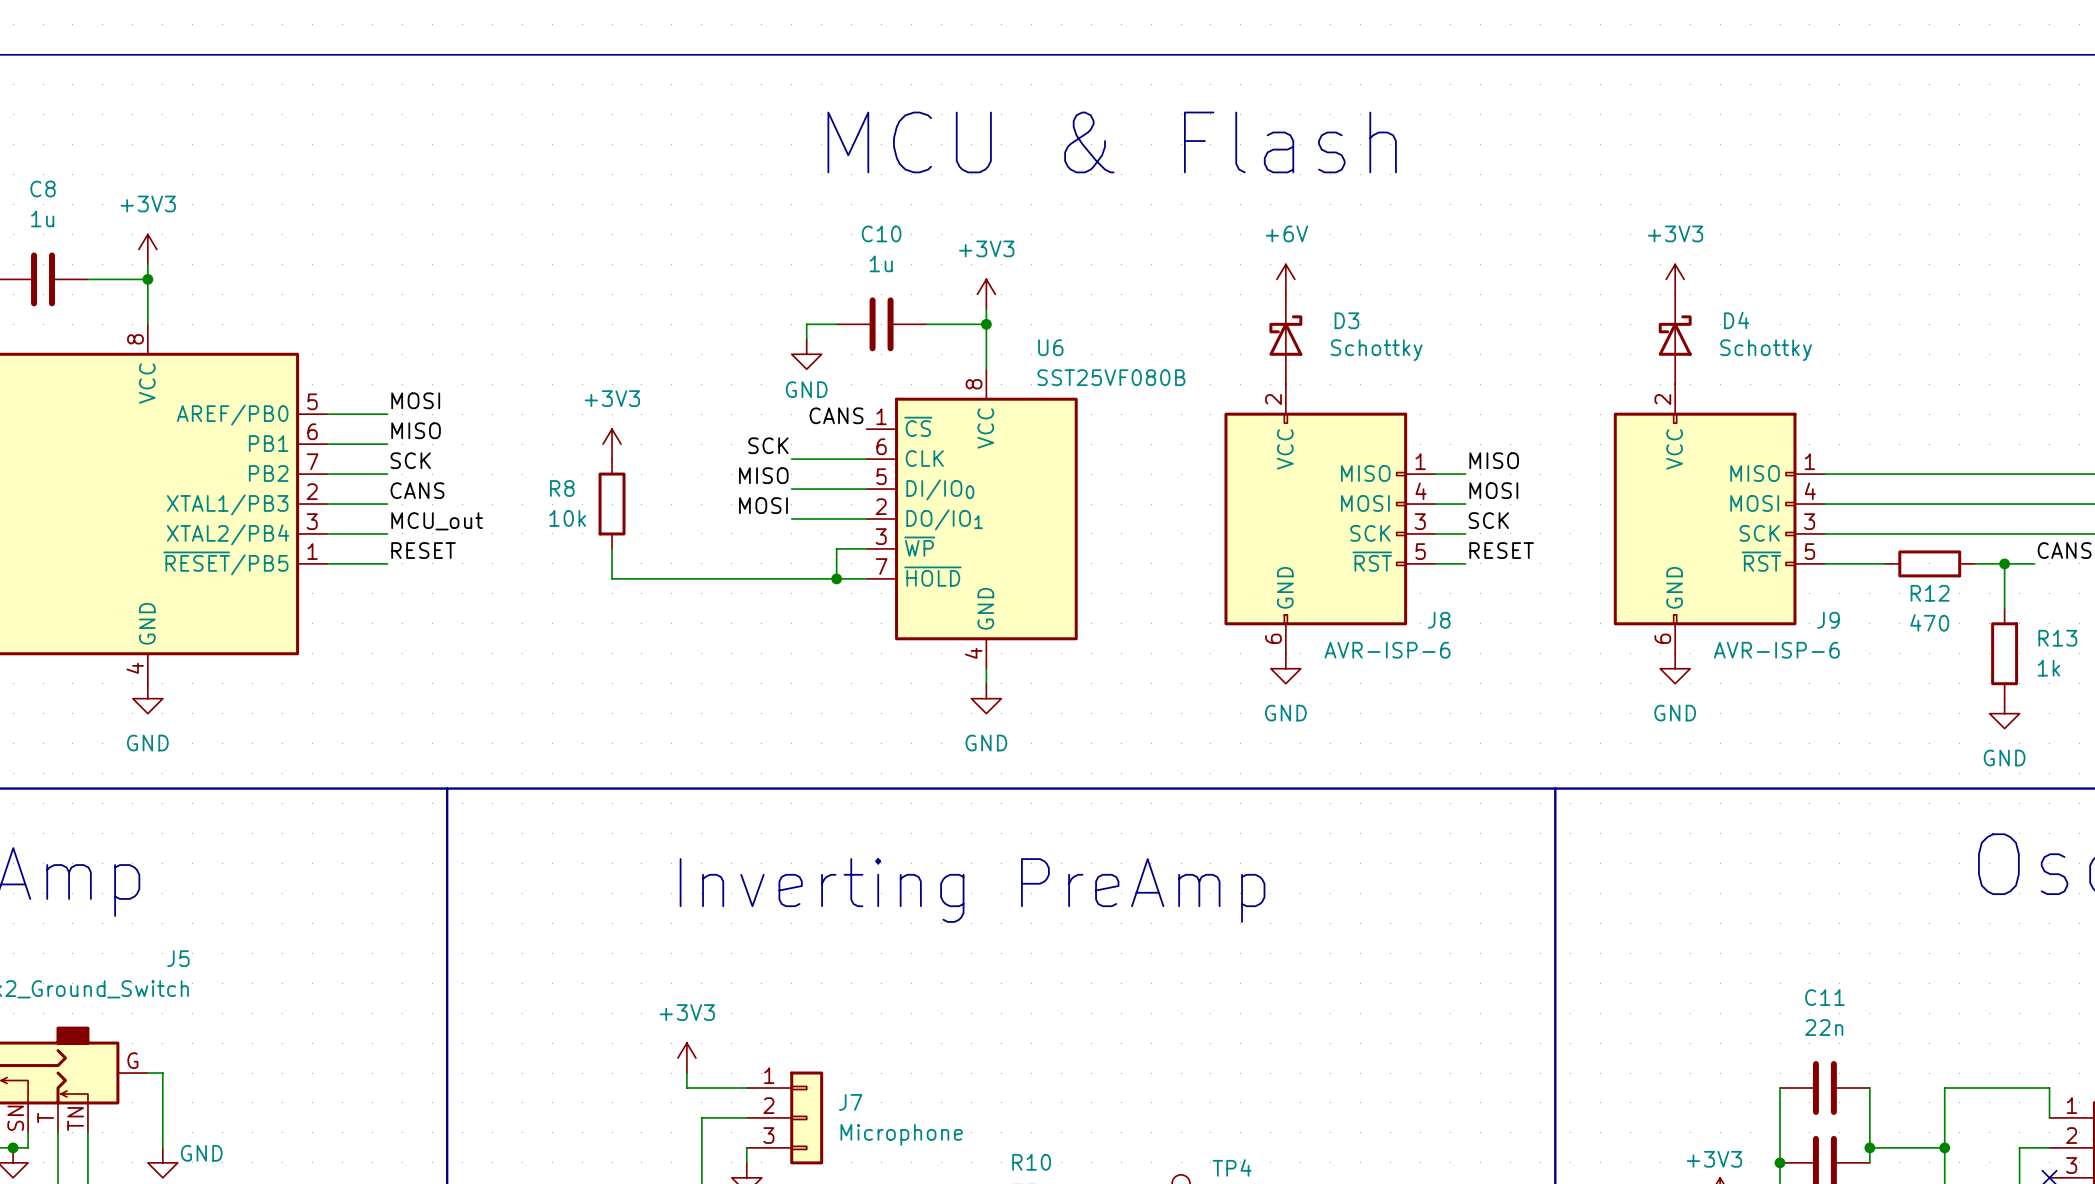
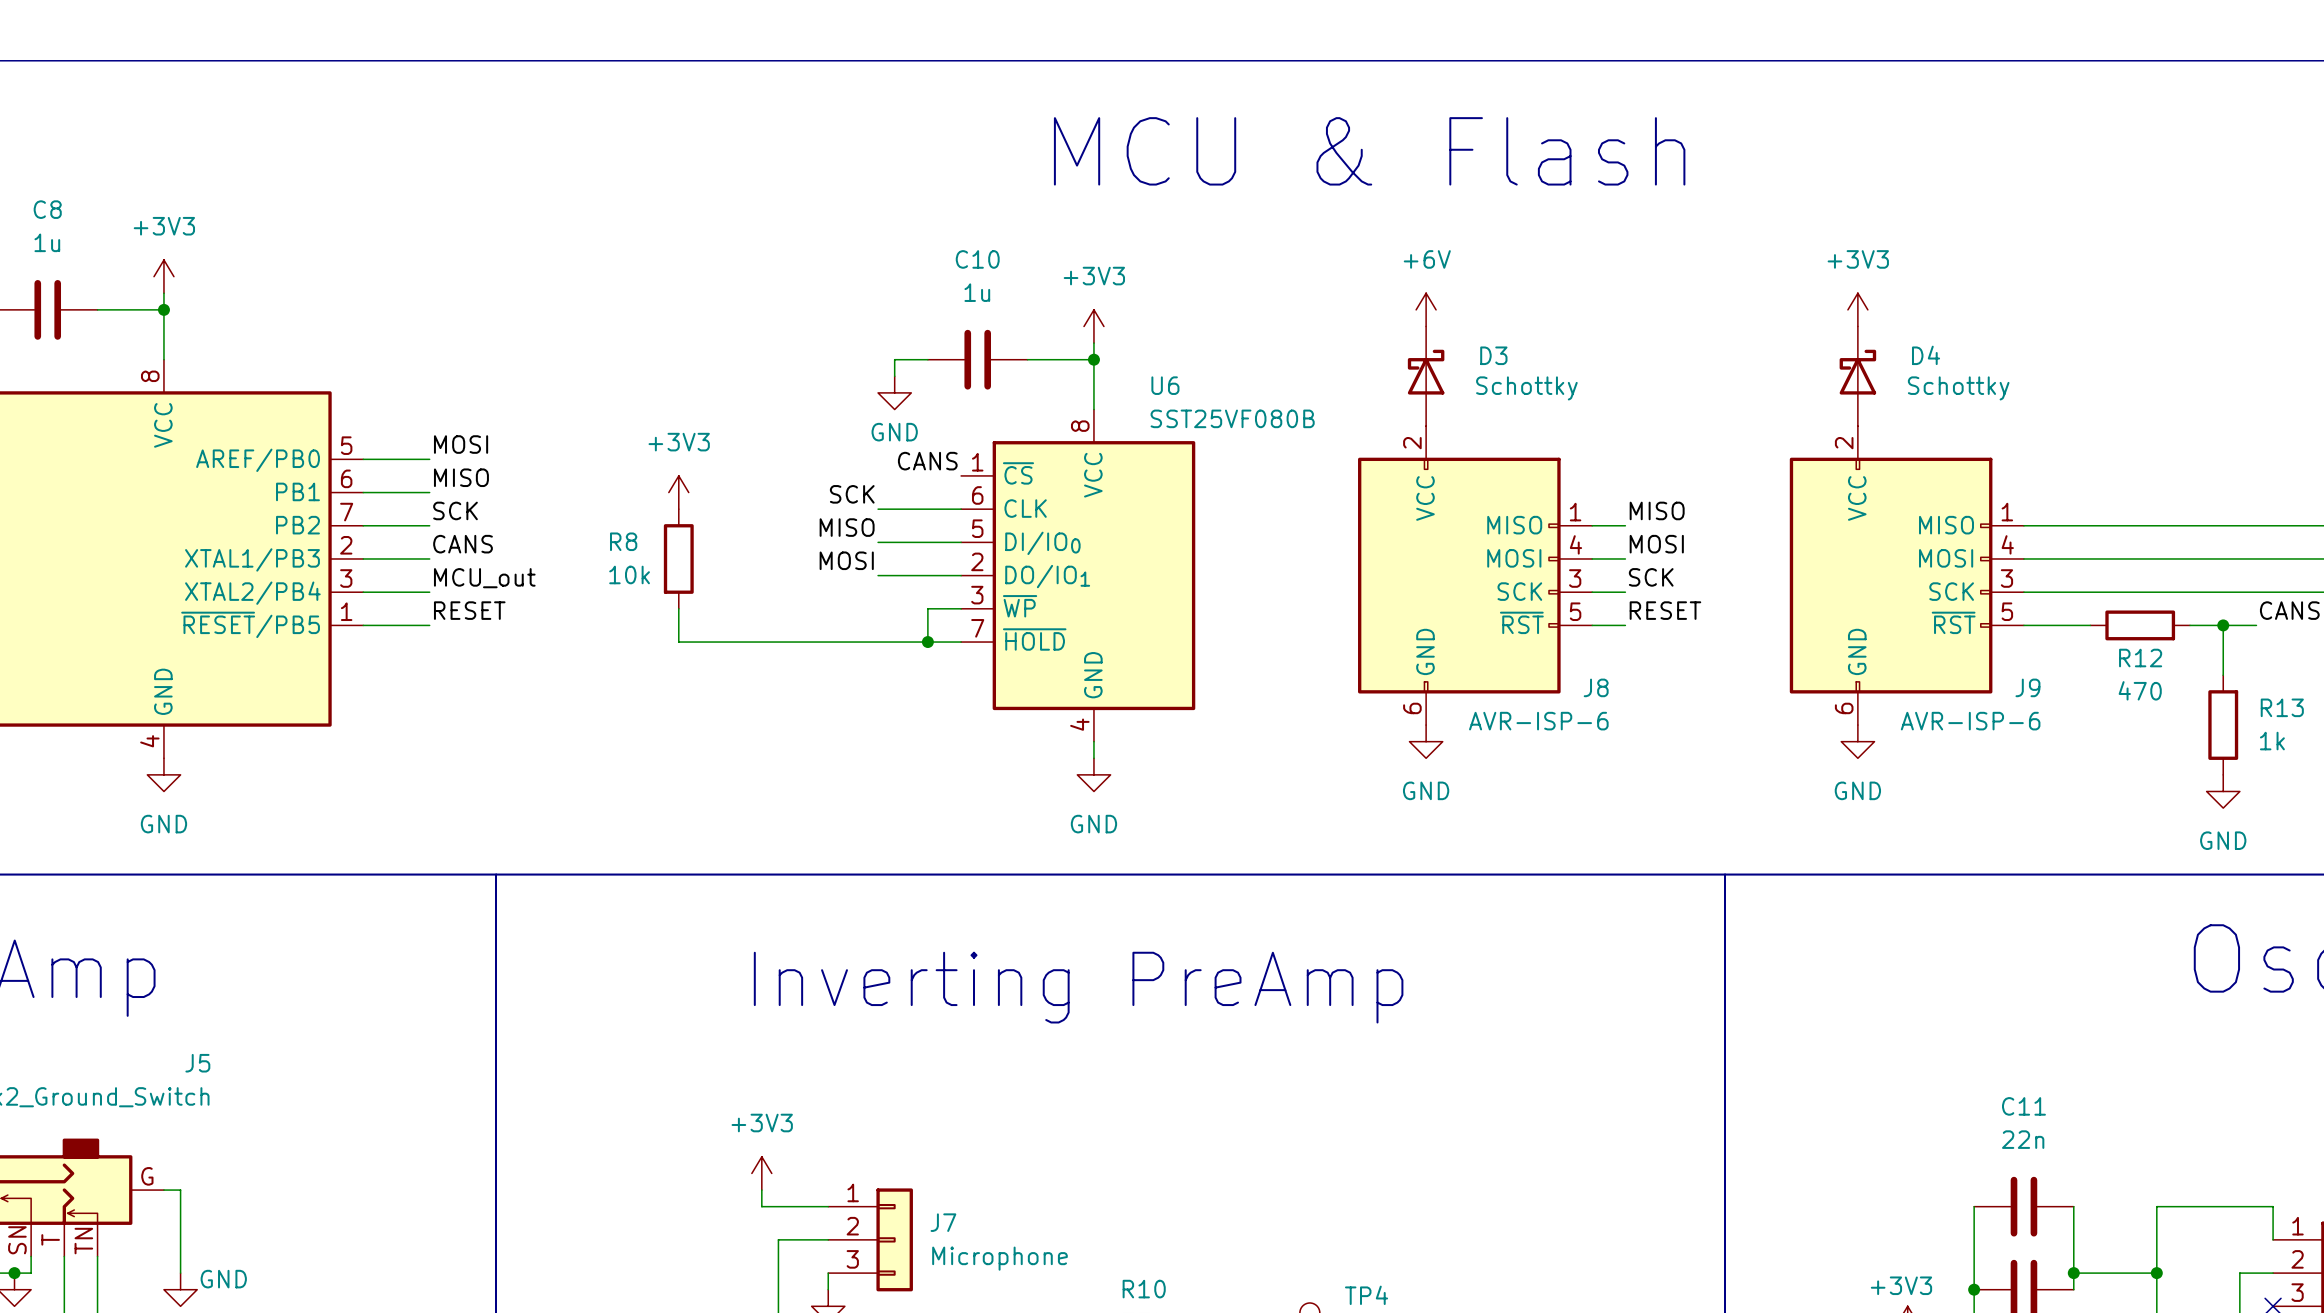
text position: MCU & Flash (1112, 142) -> MCU & Flash (1369, 151)

